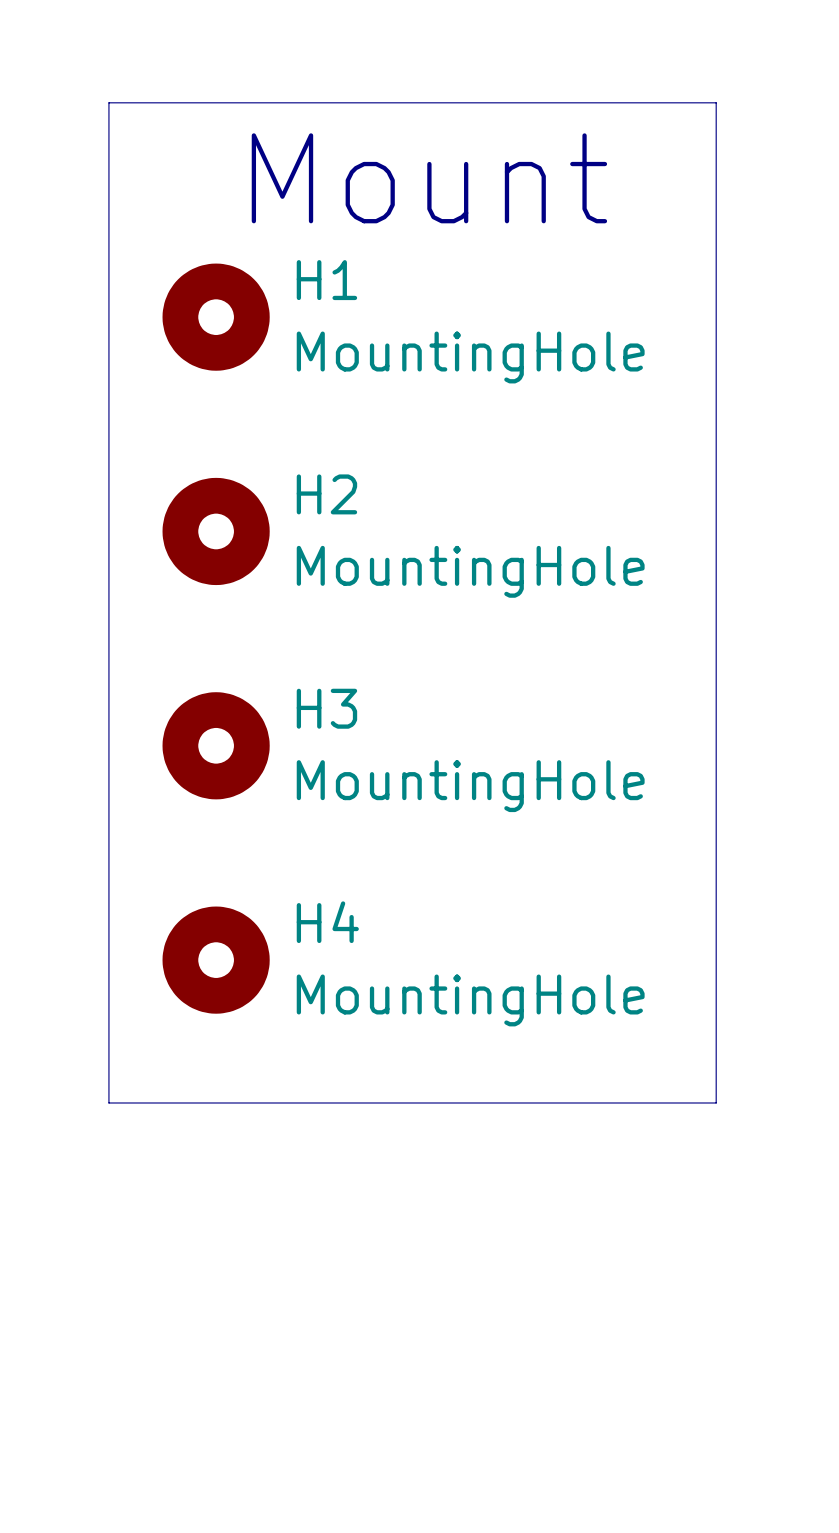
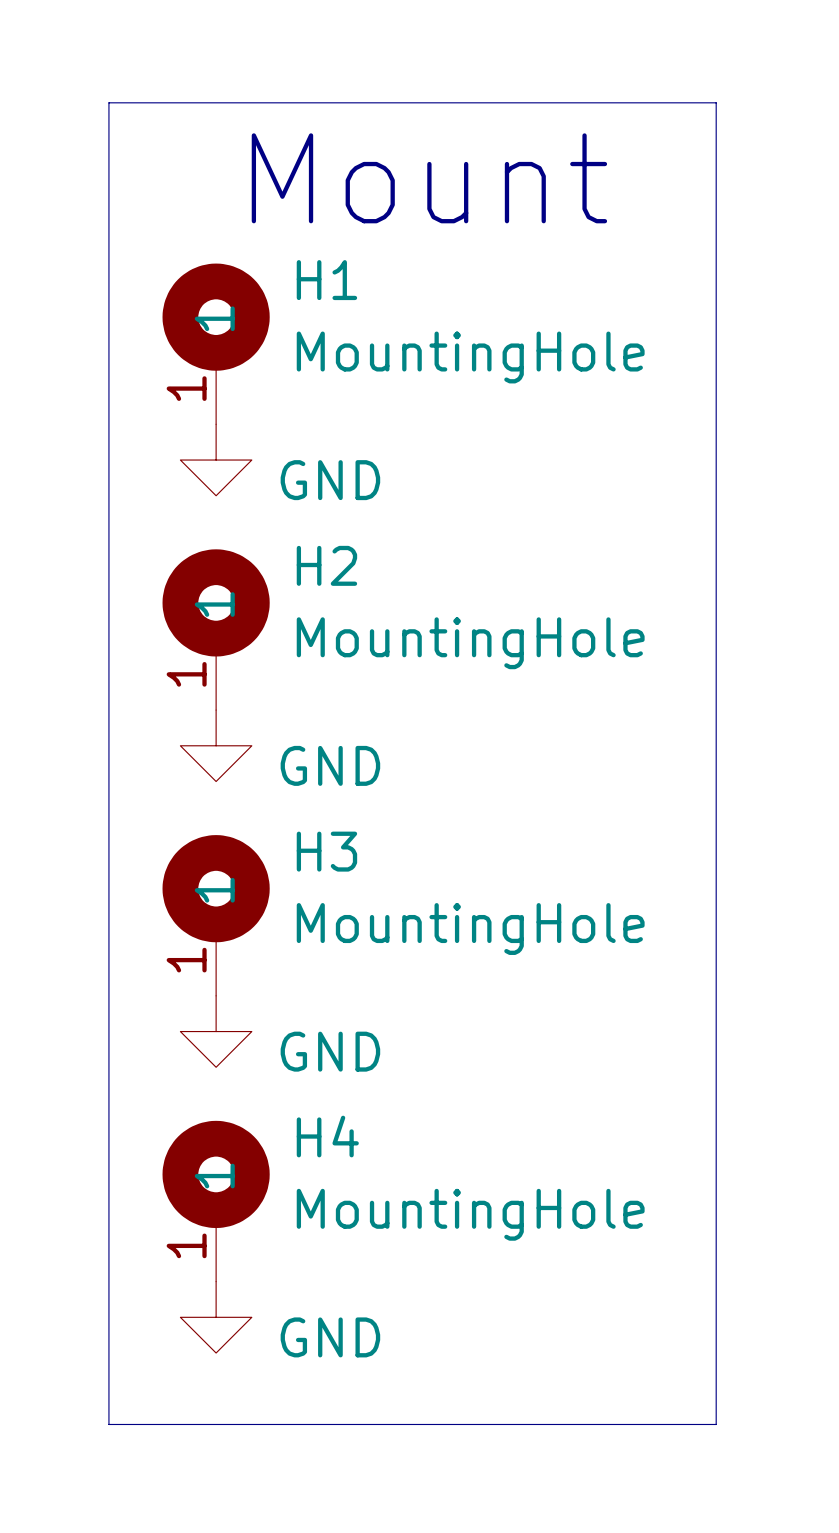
H1 symbol: [162, 263, 270, 371] -> [162, 263, 270, 425]
power symbol: none -> GND (216, 460)
H2 symbol: [162, 477, 270, 586] -> [162, 549, 270, 711]
H3 symbol: [162, 692, 270, 800] -> [162, 835, 270, 996]
power symbol: none -> GND (216, 745)
H4 symbol: [162, 906, 270, 1014] -> [162, 1120, 270, 1282]
power symbol: none -> GND (216, 1031)
line: (108, 1102) (716, 1102) -> (108, 1102) (108, 1424) (716, 1424) (716, 1102)
power symbol: none -> GND (216, 1317)

